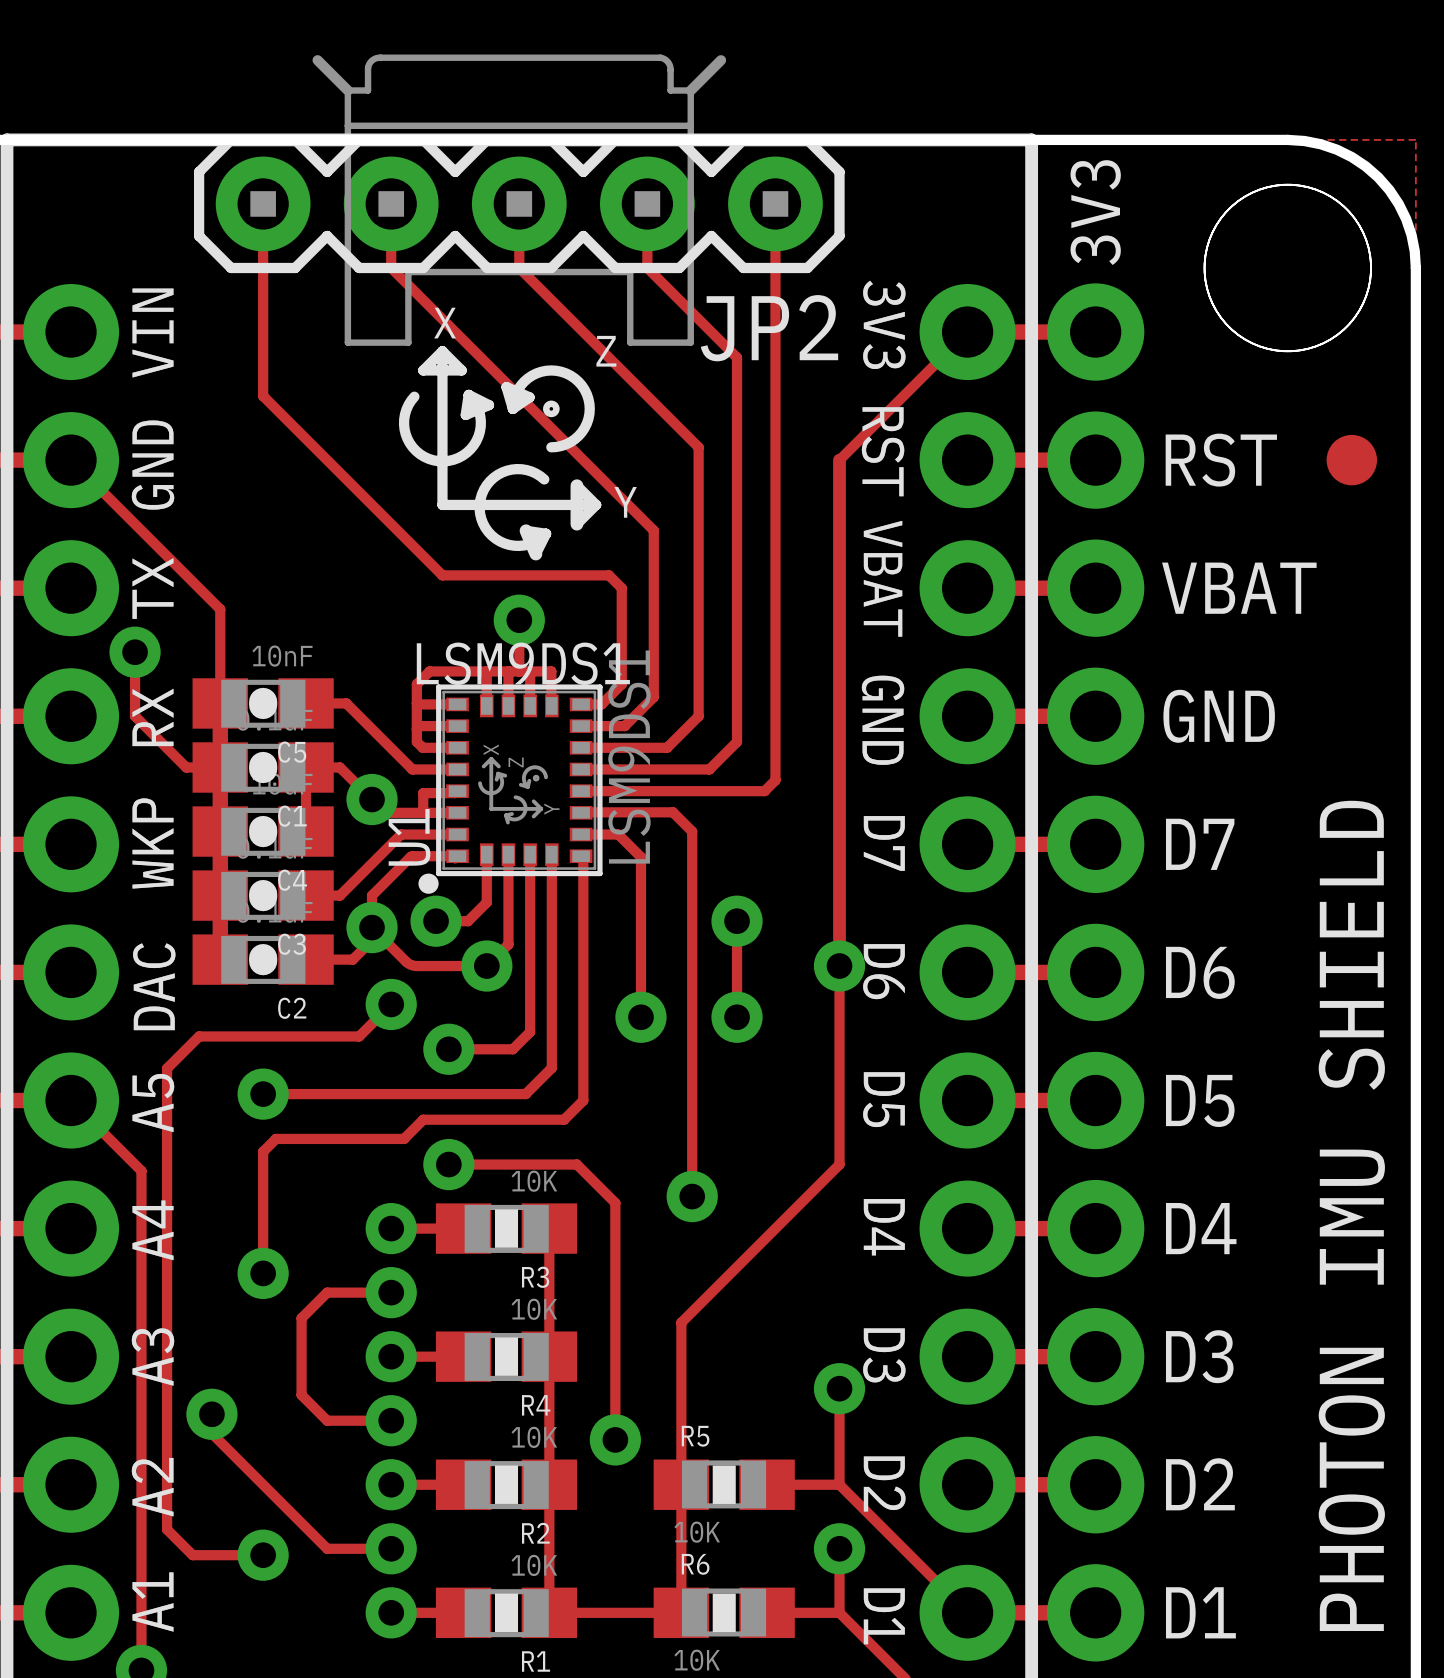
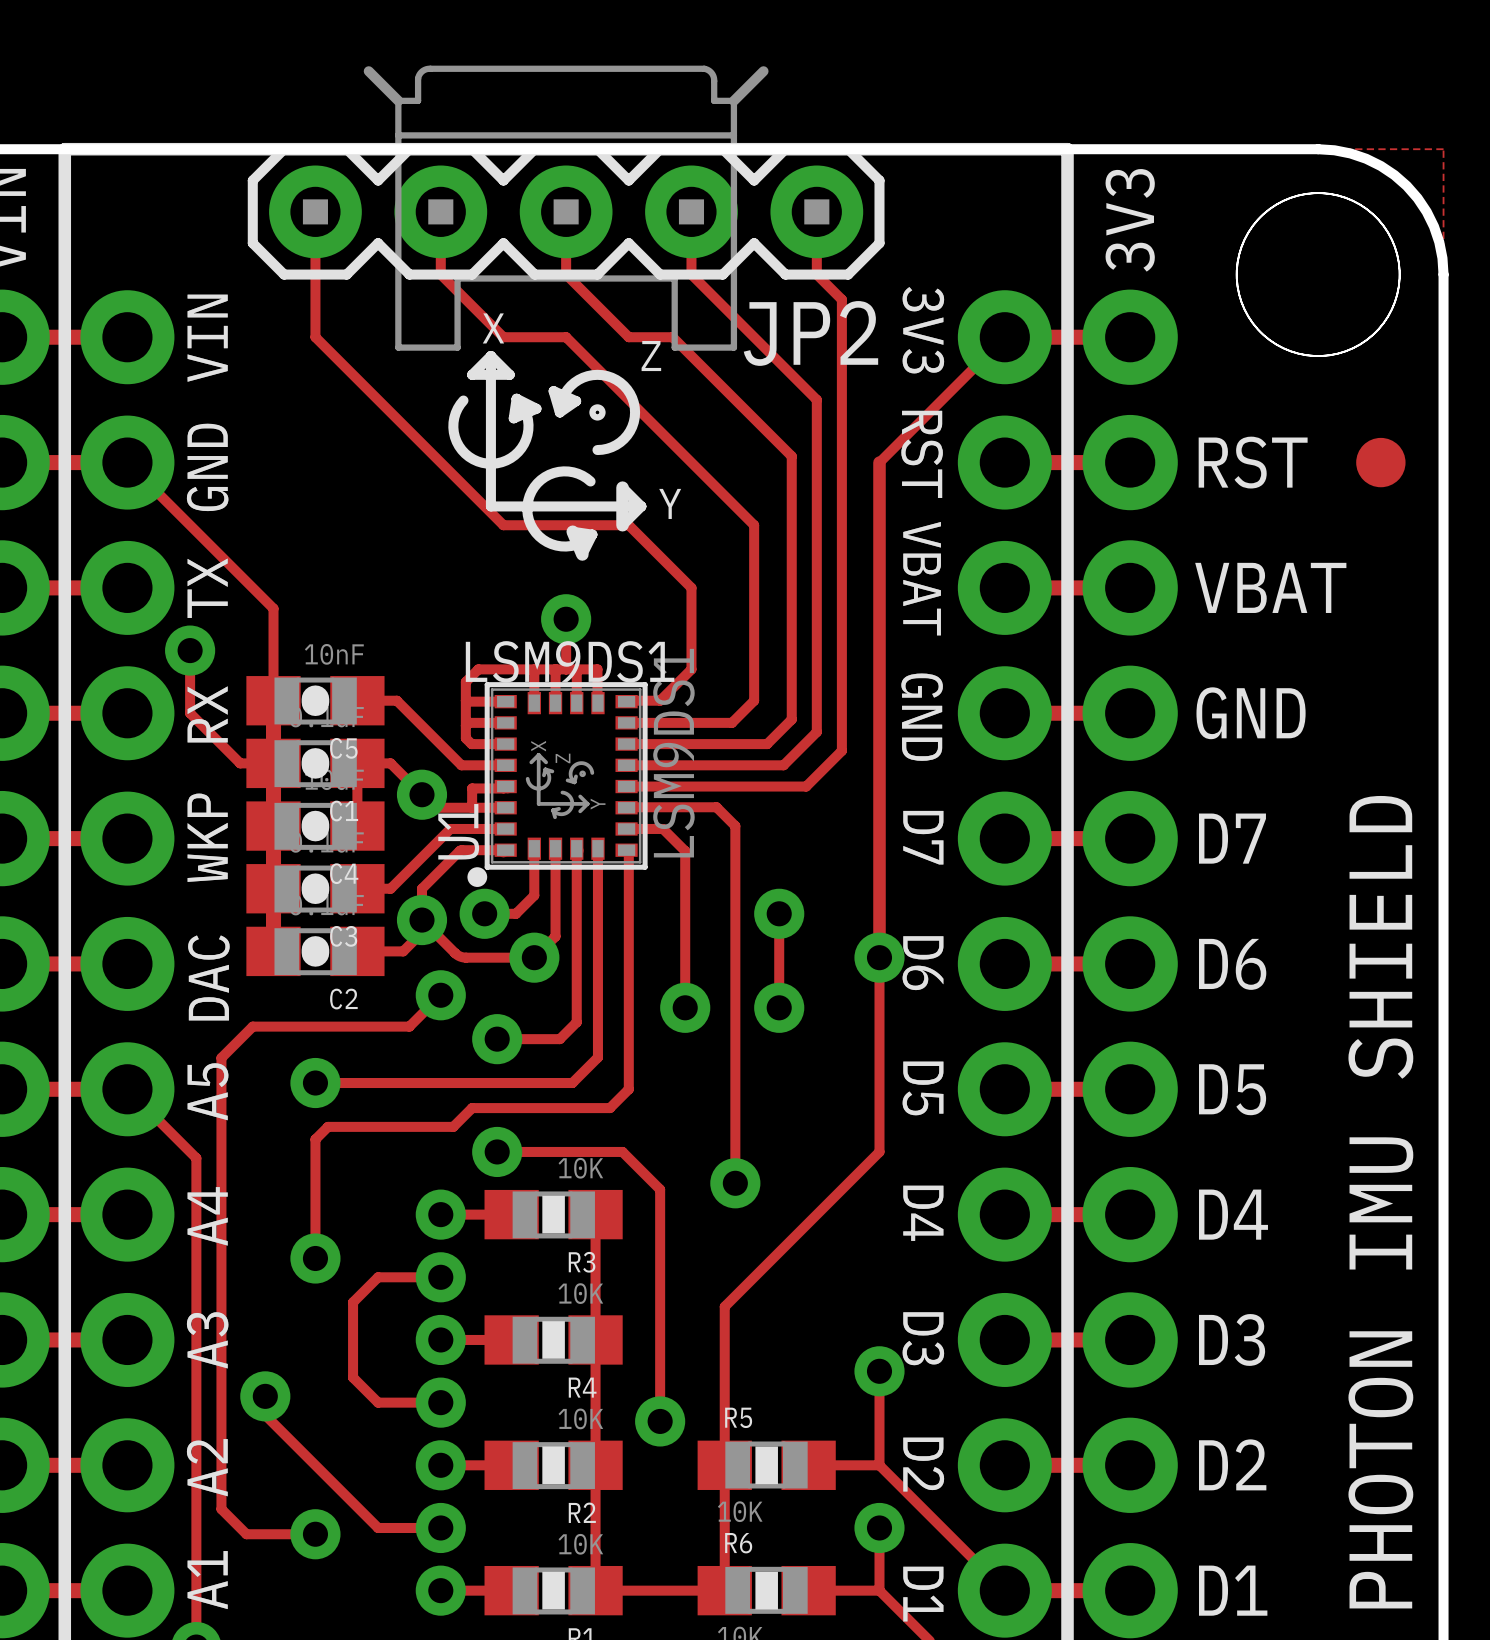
track: (775, 267) (775, 396) -> (779, 362) (816, 399)
track: none -> (816, 274) (841, 299) (841, 750) (816, 775)
track: (263, 332) (263, 396) (442, 575) (608, 575) (621, 588) (621, 684) (601, 704) (581, 704) -> (315, 337) (503, 525) (628, 525) (691, 587) (691, 669) (660, 700) (626, 701)
track: (455, 332) (653, 530) (653, 697) (624, 726) -> (503, 337) (566, 337) (754, 525) (754, 700) (741, 713)
track: (583, 332) (698, 447) (698, 716) -> (628, 337) (672, 337) (791, 456) (791, 719) (767, 744) (710, 744)
track: (737, 357) (737, 741) (709, 769) -> none
track: (688, 726) (667, 747) -> (731, 722) (669, 722)
track: (775, 735) (775, 780) -> (816, 732) (783, 765) (752, 765)

